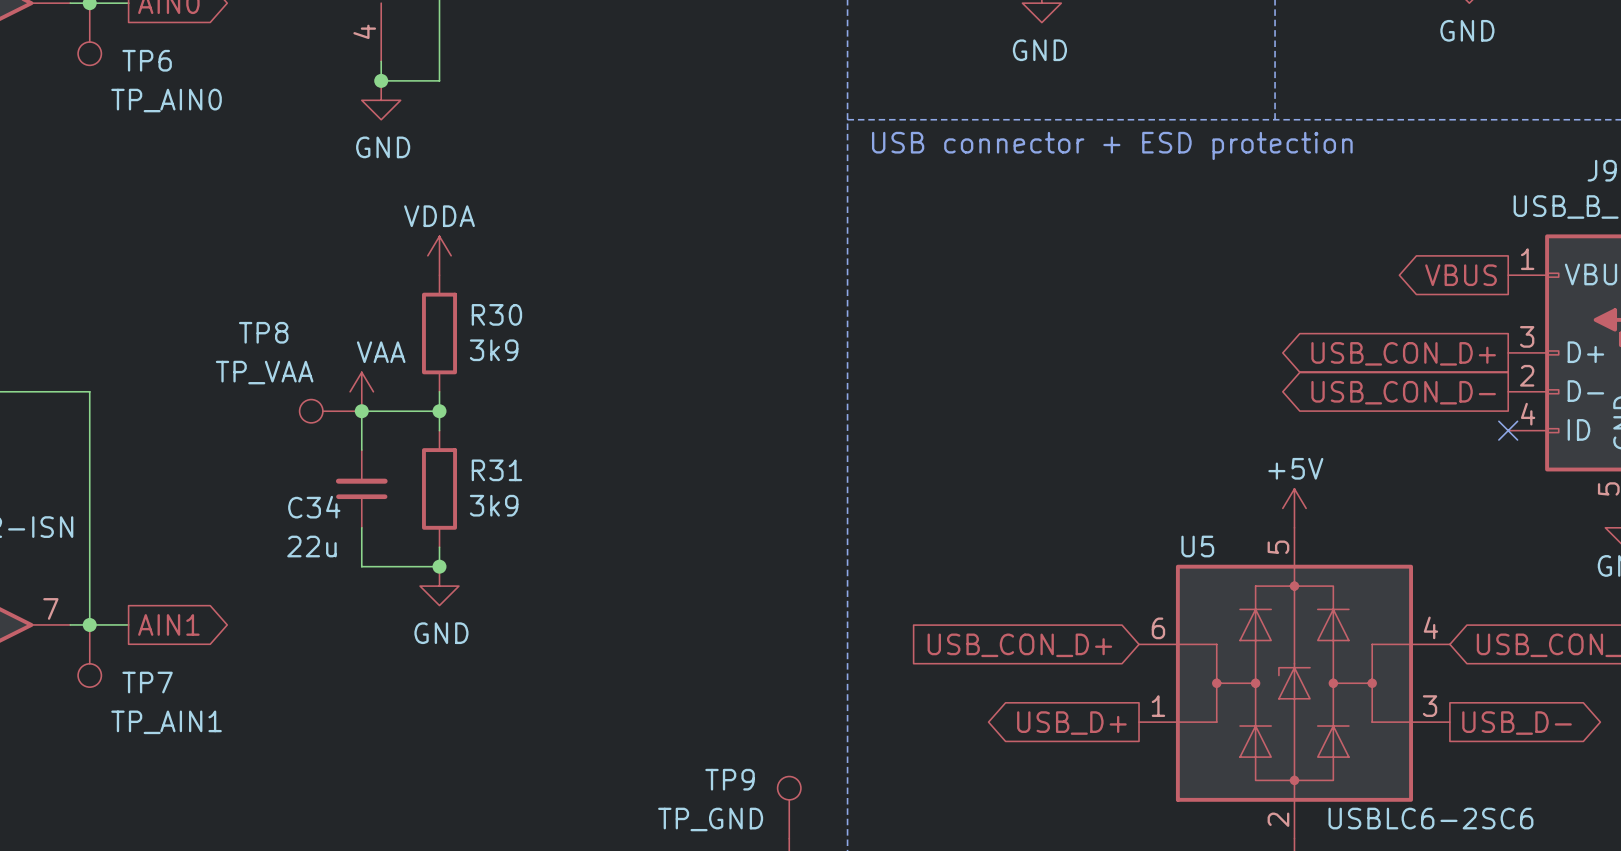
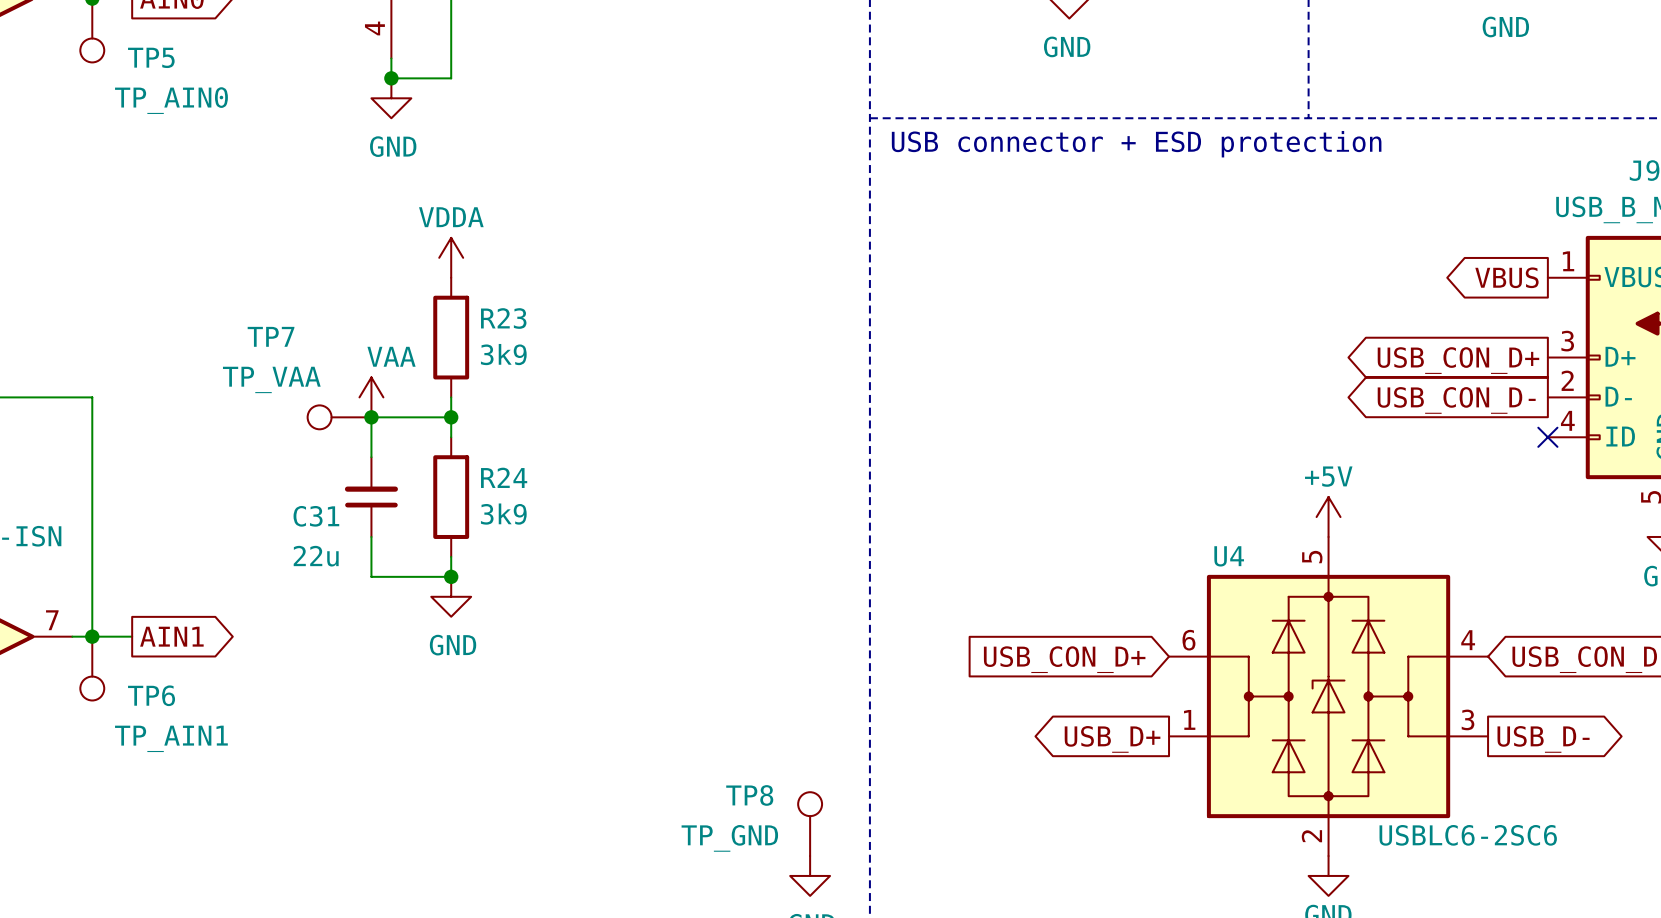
TP6 name: TP6 (147, 60) -> TP5 (151, 57)
R30 name: R30 (496, 314) -> R23 (503, 318)
TP8 name: TP8 (263, 332) -> TP7 (271, 336)
R31 name: R31 (496, 470) -> R24 (504, 477)
C34 name: C34 (314, 507) -> C31 (316, 516)
U5 name: U5 (1197, 546) -> U4 (1229, 556)
TP7 name: TP7 (147, 682) -> TP6 (151, 695)
TP9 name: TP9 (730, 779) -> TP8 (749, 795)

